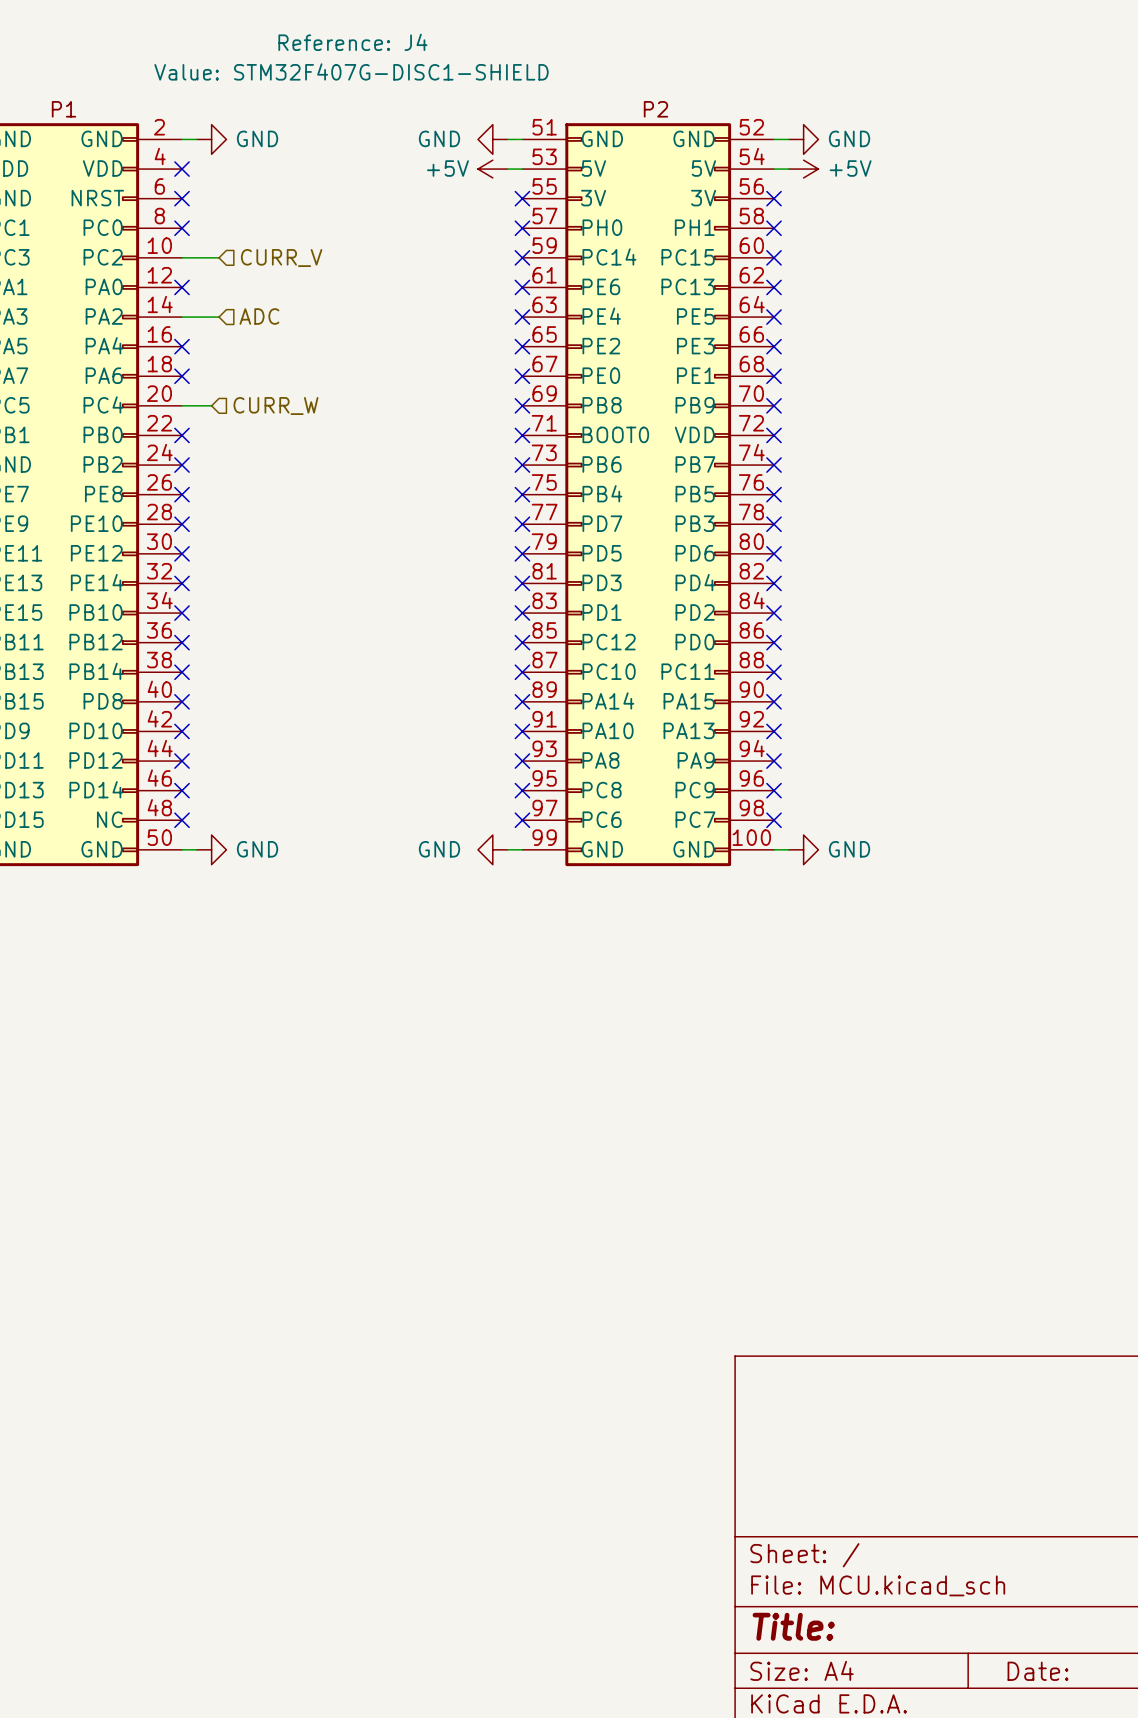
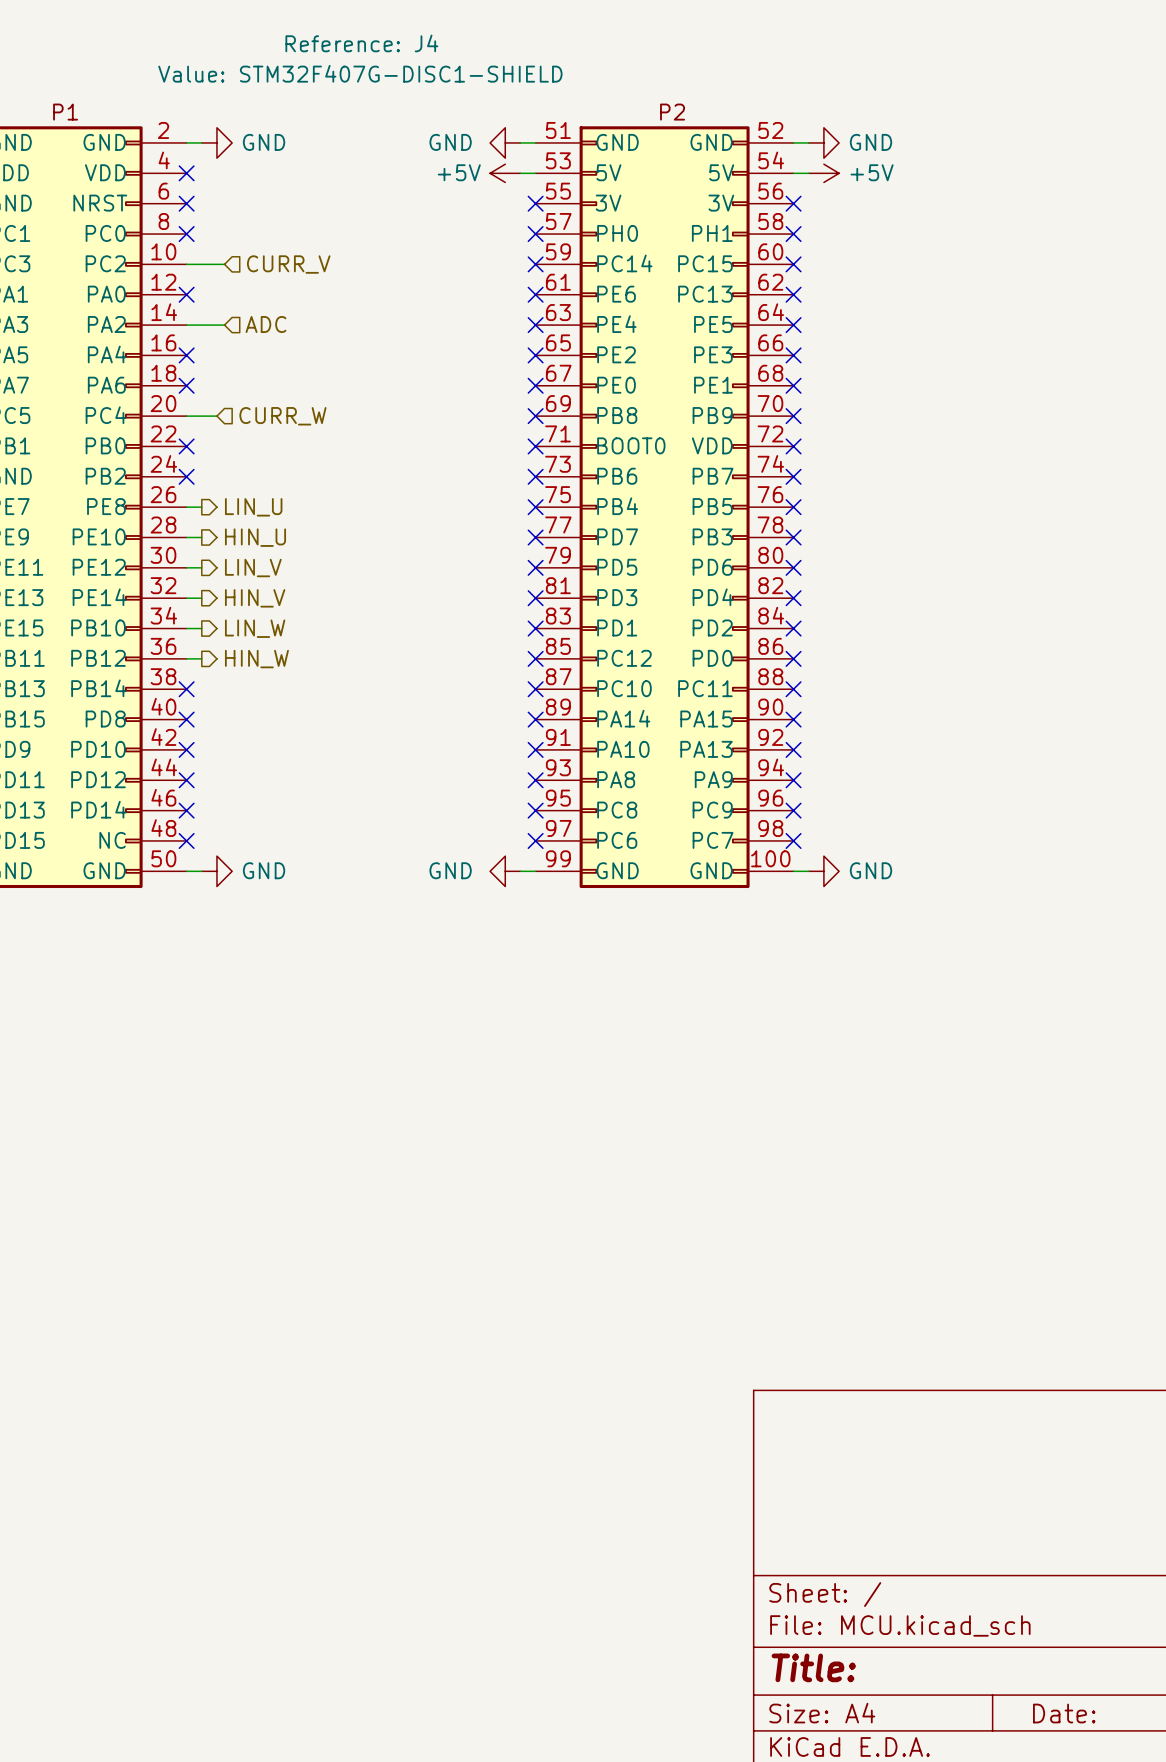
wire: none -> (186, 507) (201, 507)
no-connect mark: (182, 494) -> none
hierarchical label: none -> LIN_U (253, 507)
wire: none -> (186, 537) (201, 537)
no-connect mark: (182, 524) -> none
hierarchical label: none -> HIN_U (255, 537)
wire: none -> (186, 567) (201, 567)
no-connect mark: (182, 553) -> none
hierarchical label: none -> LIN_V (253, 568)
wire: none -> (186, 598) (201, 598)
no-connect mark: (182, 583) -> none
hierarchical label: none -> HIN_V (255, 598)
wire: none -> (186, 628) (201, 628)
no-connect mark: (182, 613) -> none
hierarchical label: none -> LIN_W (255, 628)
wire: none -> (186, 658) (201, 658)
no-connect mark: (182, 642) -> none
hierarchical label: none -> HIN_W (256, 659)

